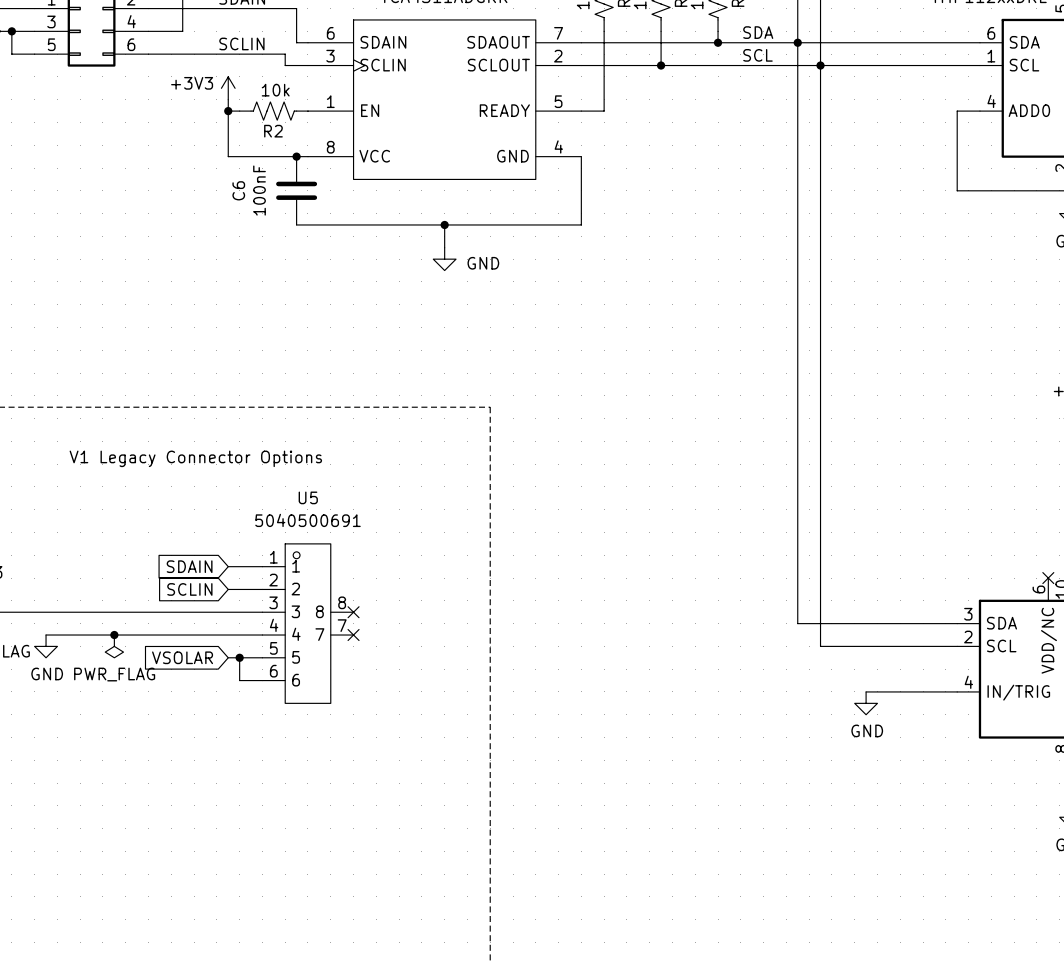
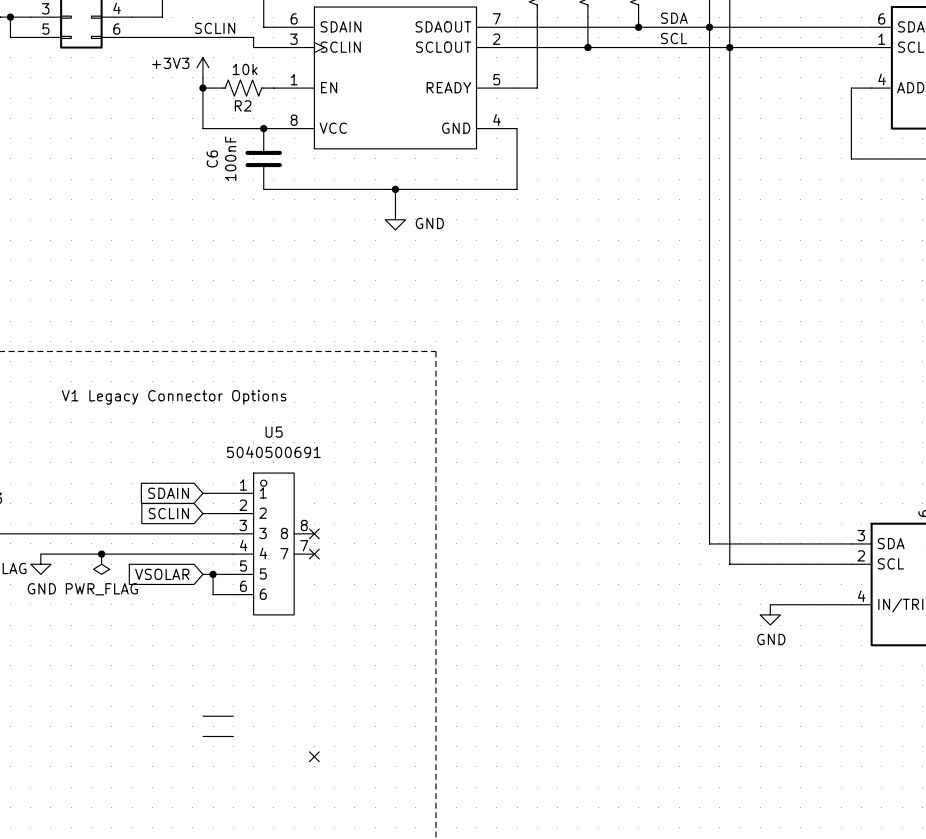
wire: none -> (202, 716) (233, 716)
wire: none -> (202, 736) (233, 736)
no-connect mark: none -> (314, 756)

